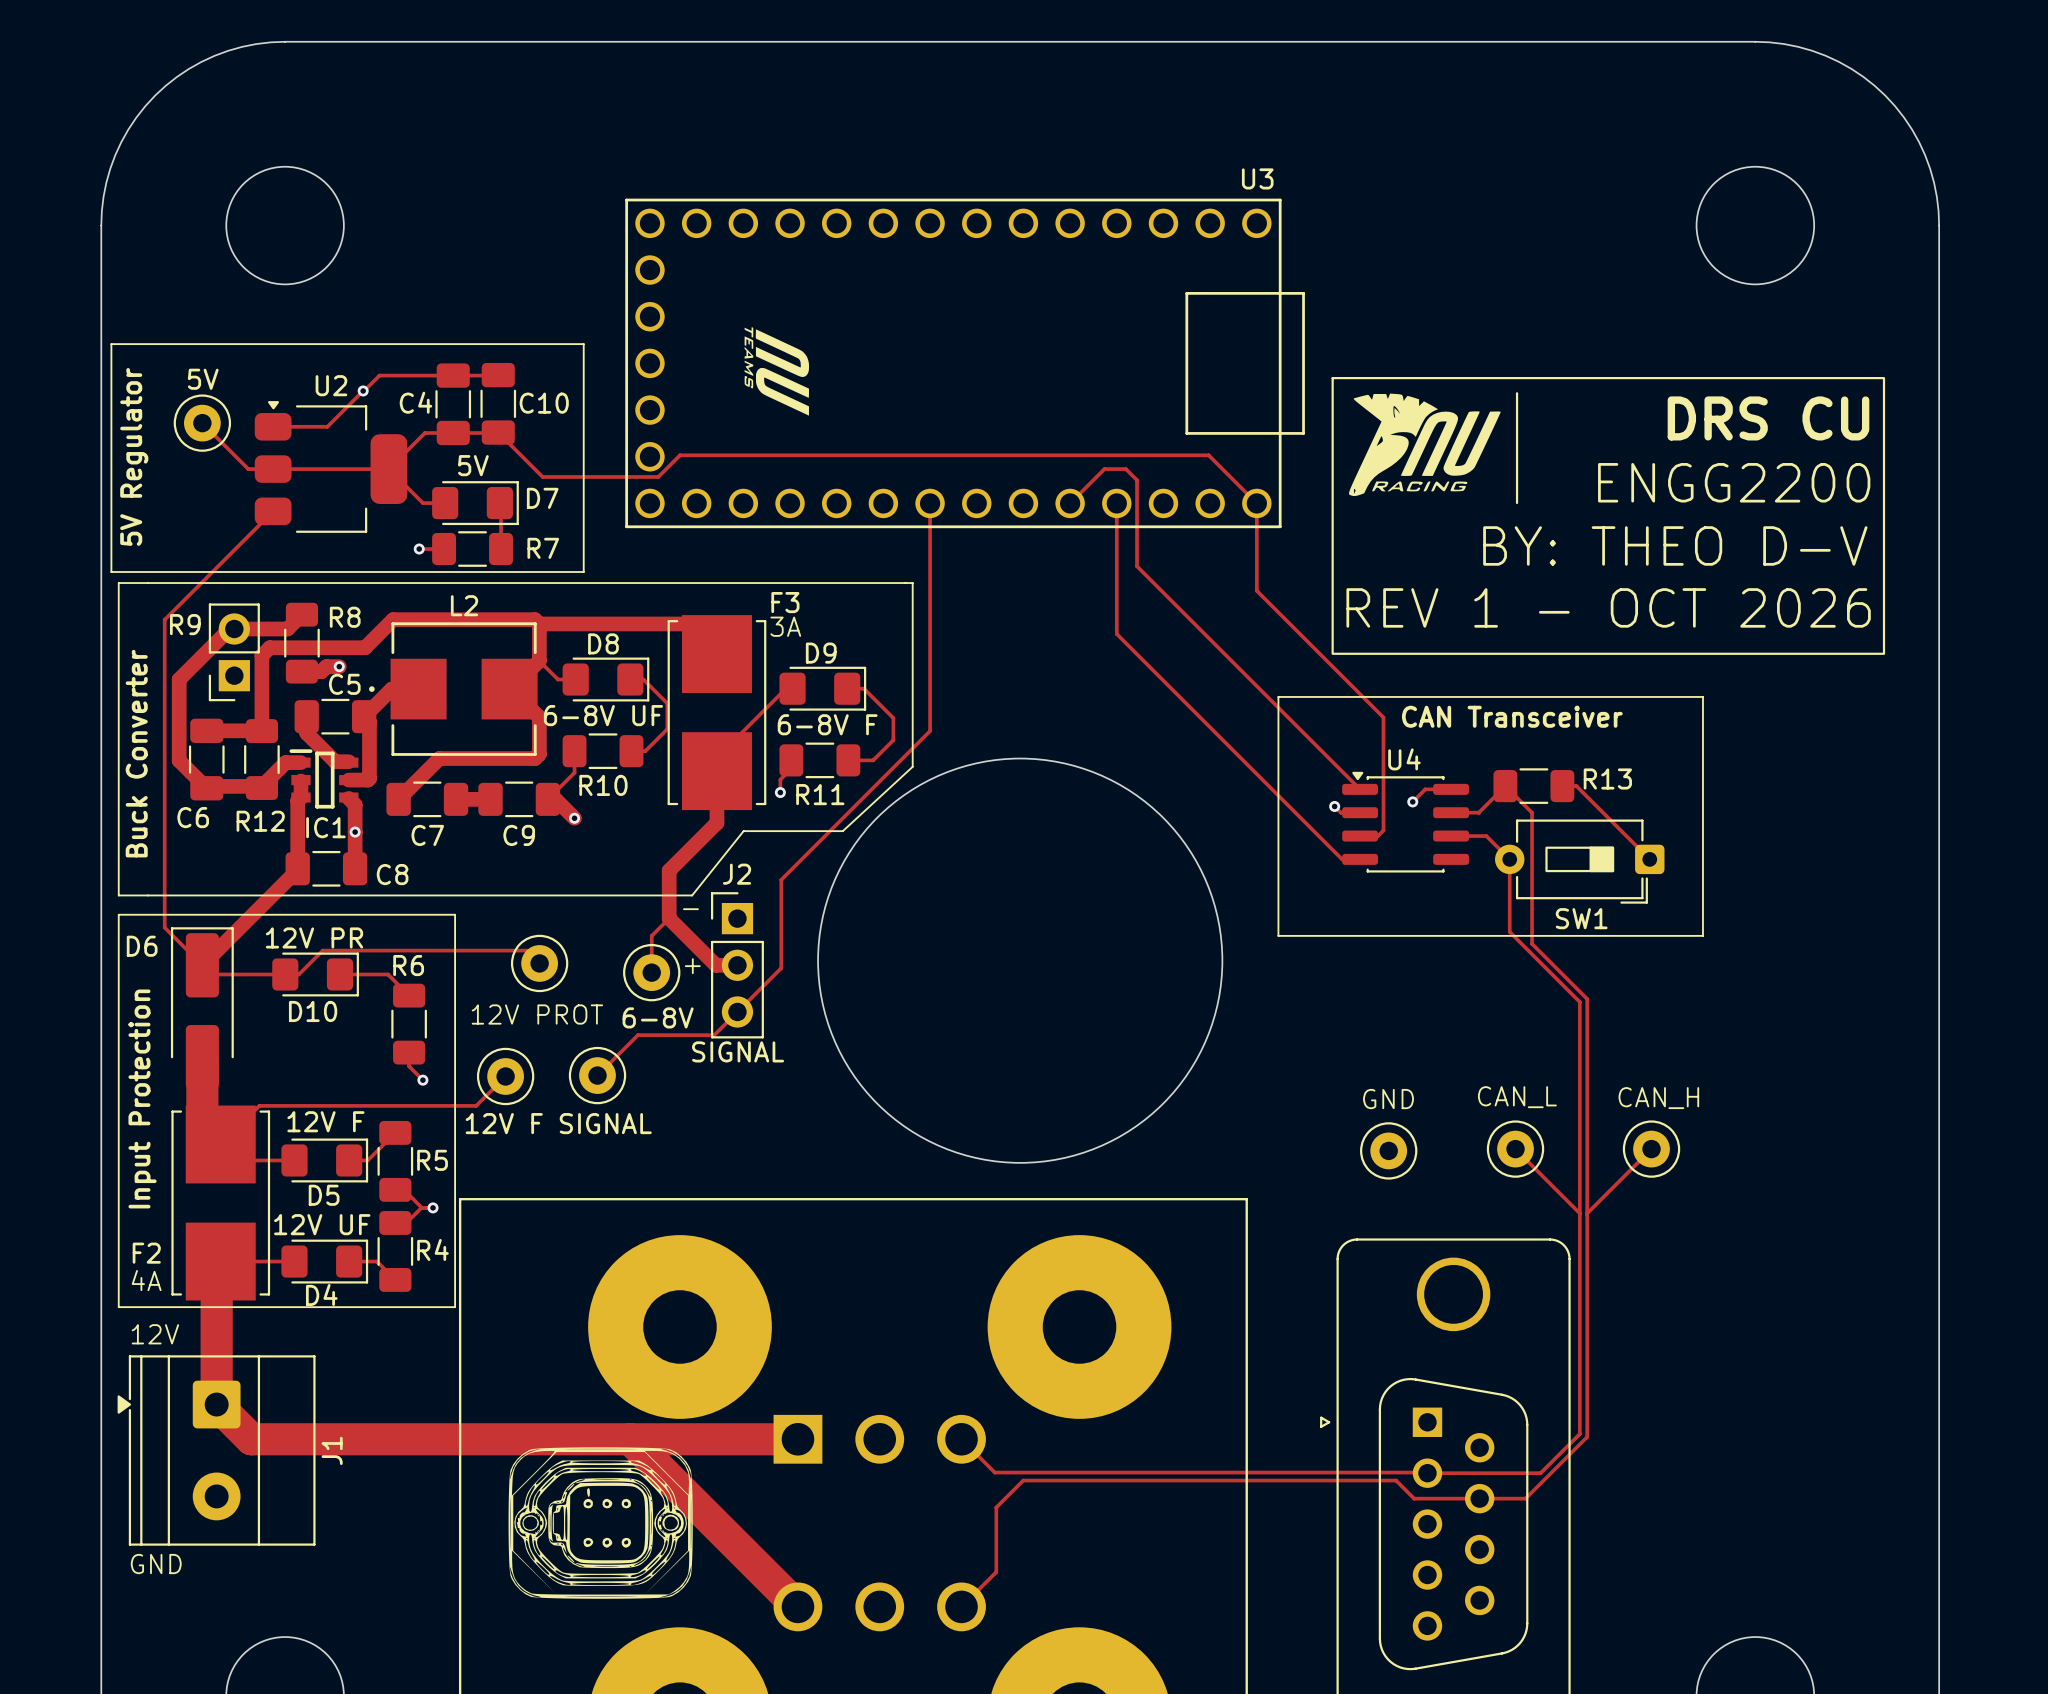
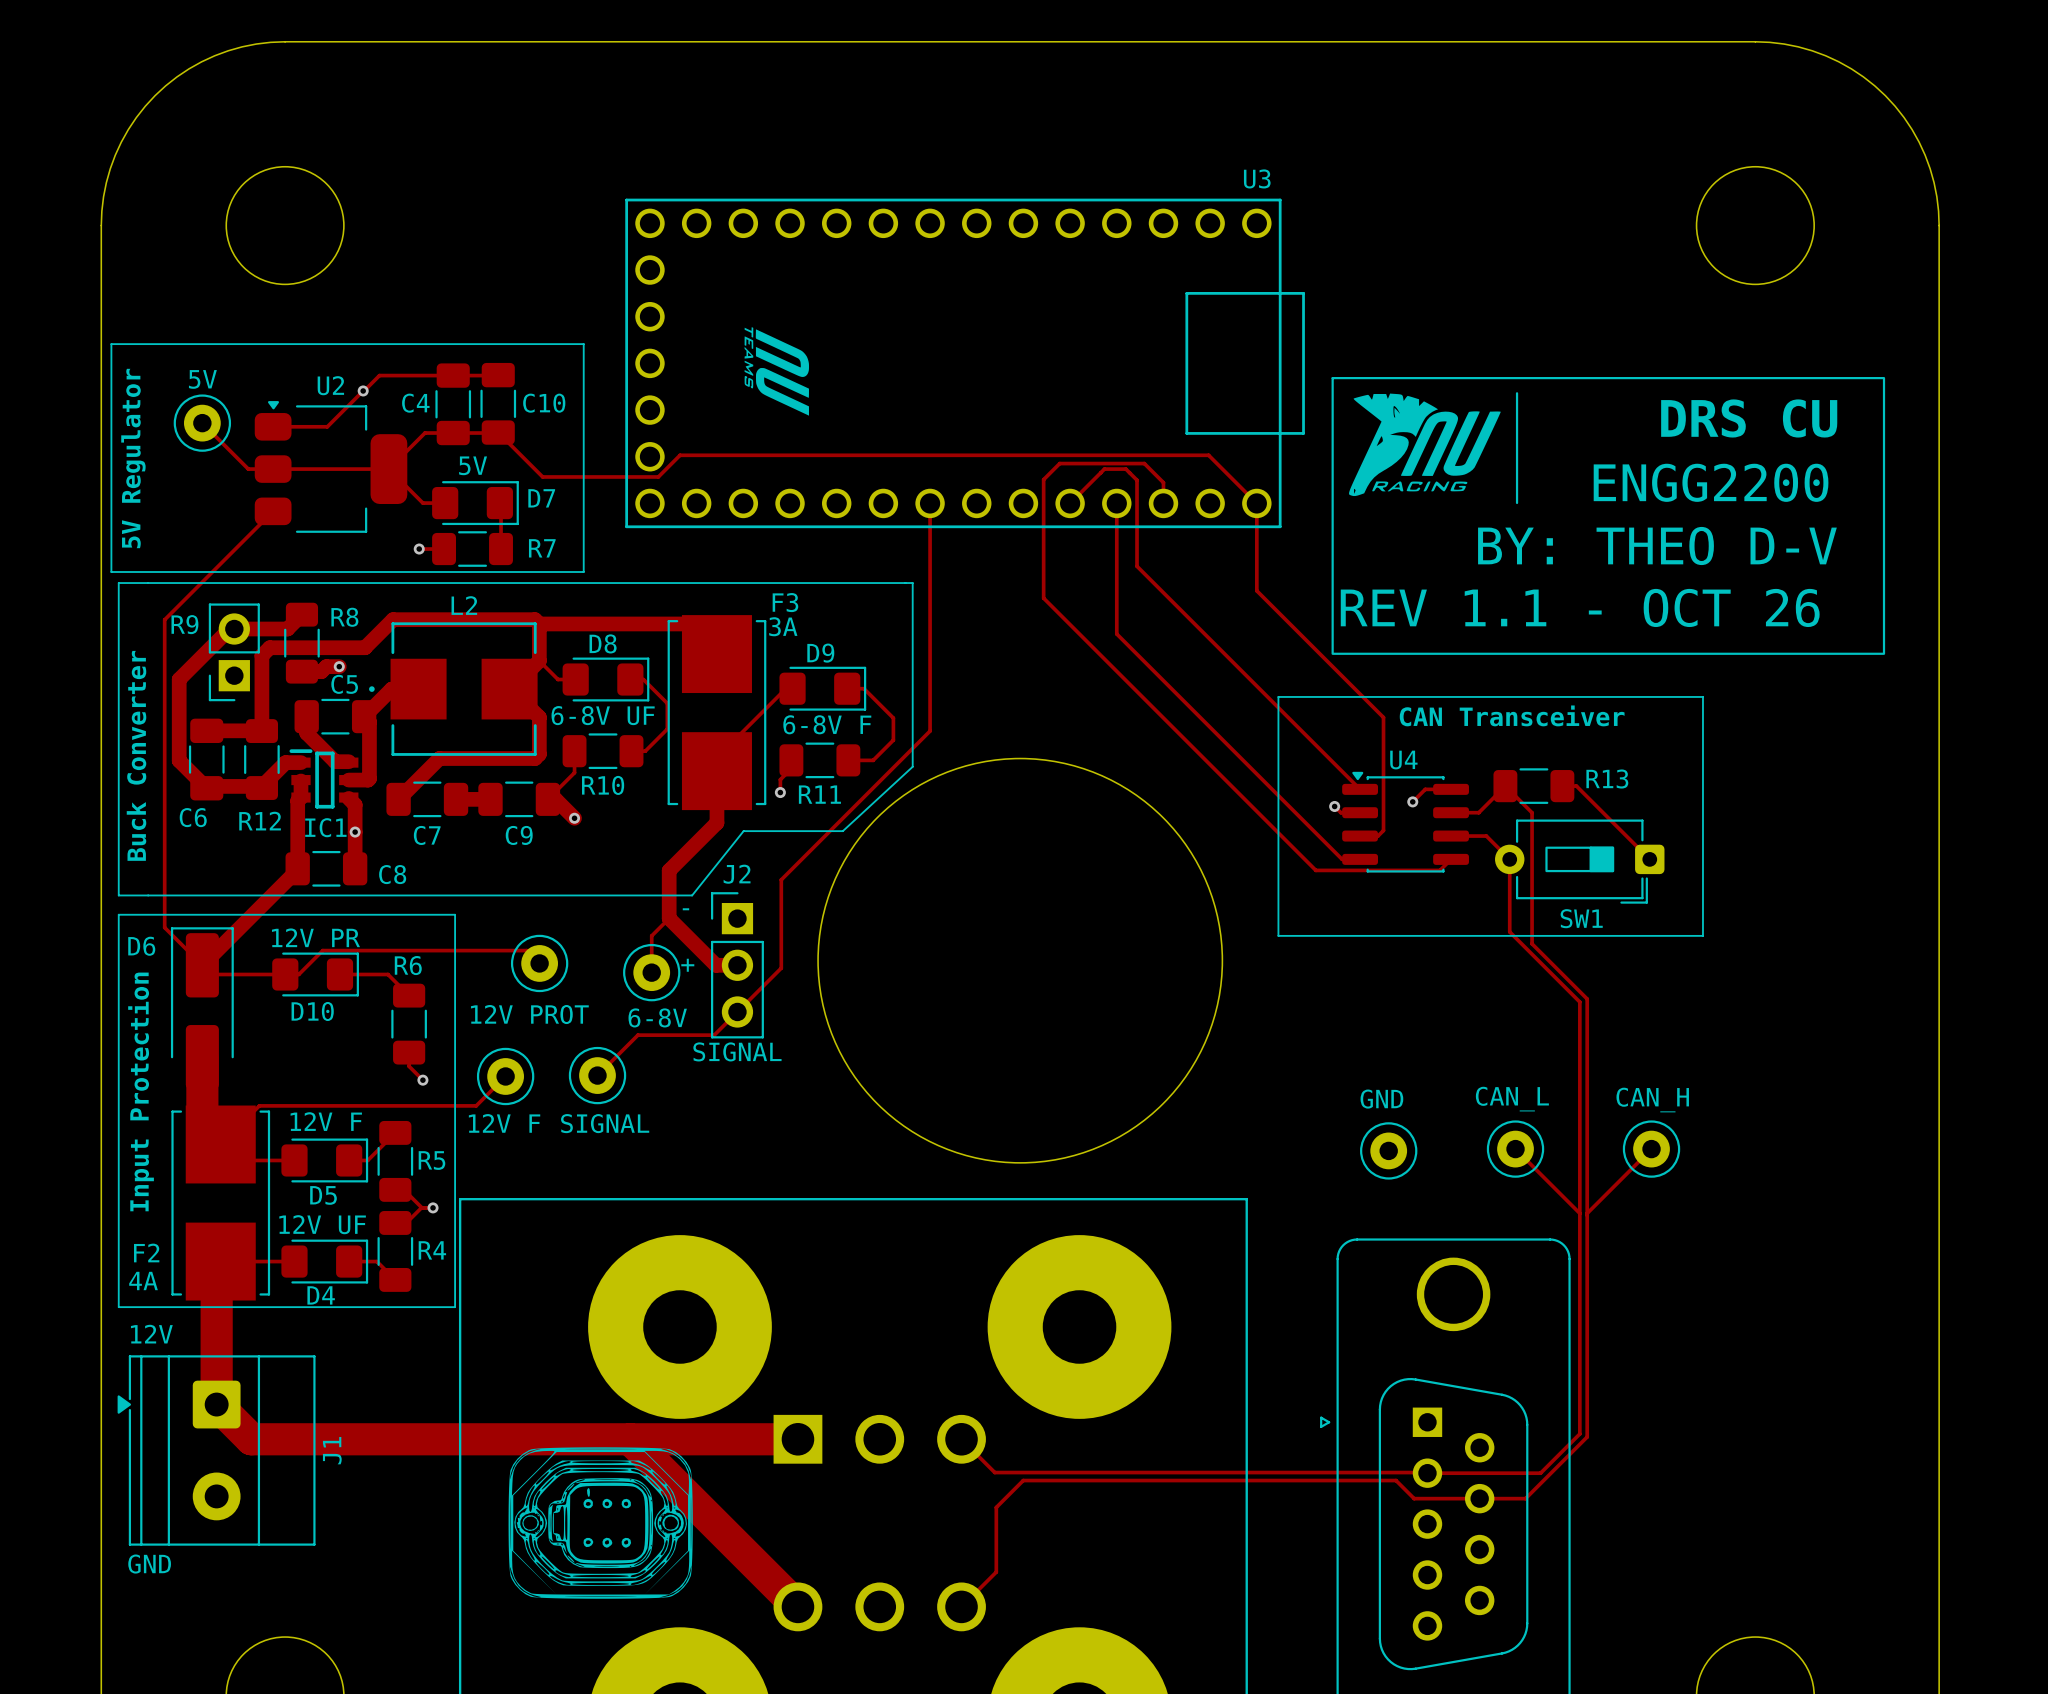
drawing shape: [1331, 377, 1886, 655] -> [1331, 377, 1886, 655]
track: none -> (1163, 503) (1163, 482) (1144, 463) (1059, 463) (1043, 479) (1043, 598) (1315, 870) (1440, 870) (1451, 859)

